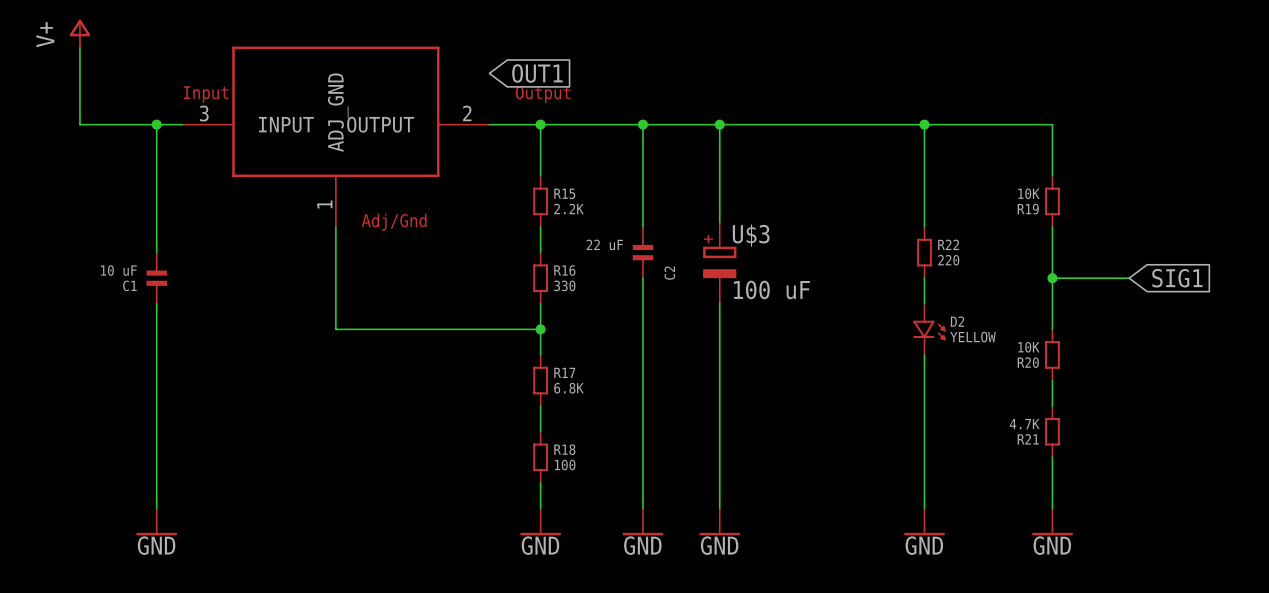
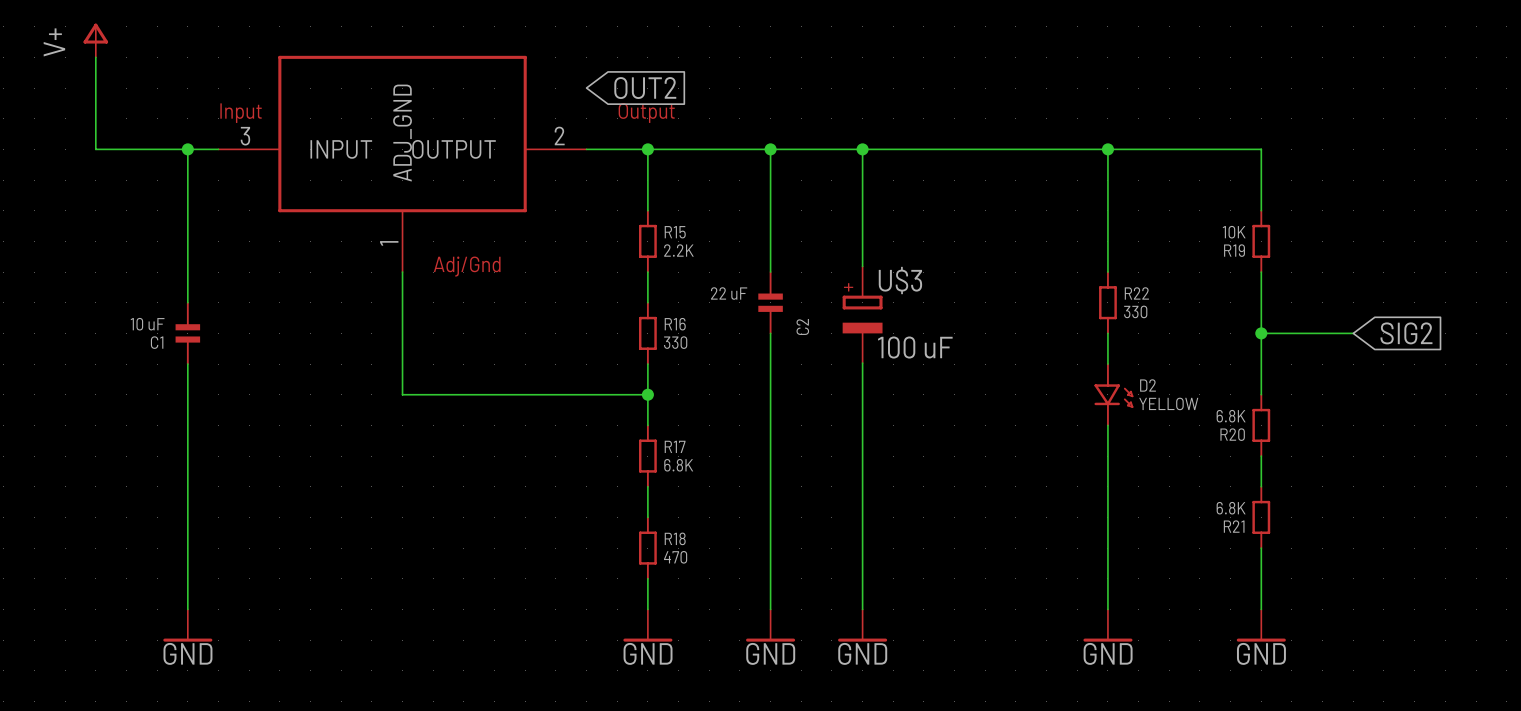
global label: OUT1 (537, 73) -> OUT2 (645, 88)
R22 value: 220 (948, 260) -> 330 (1135, 311)
global label: SIG1 (1177, 278) -> SIG2 (1406, 333)
R20 value: 10K (1028, 347) -> 6.8K (1231, 416)
R21 value: 4.7K (1024, 424) -> 6.8K (1231, 508)
R18 value: 100 (565, 465) -> 470 (675, 557)

